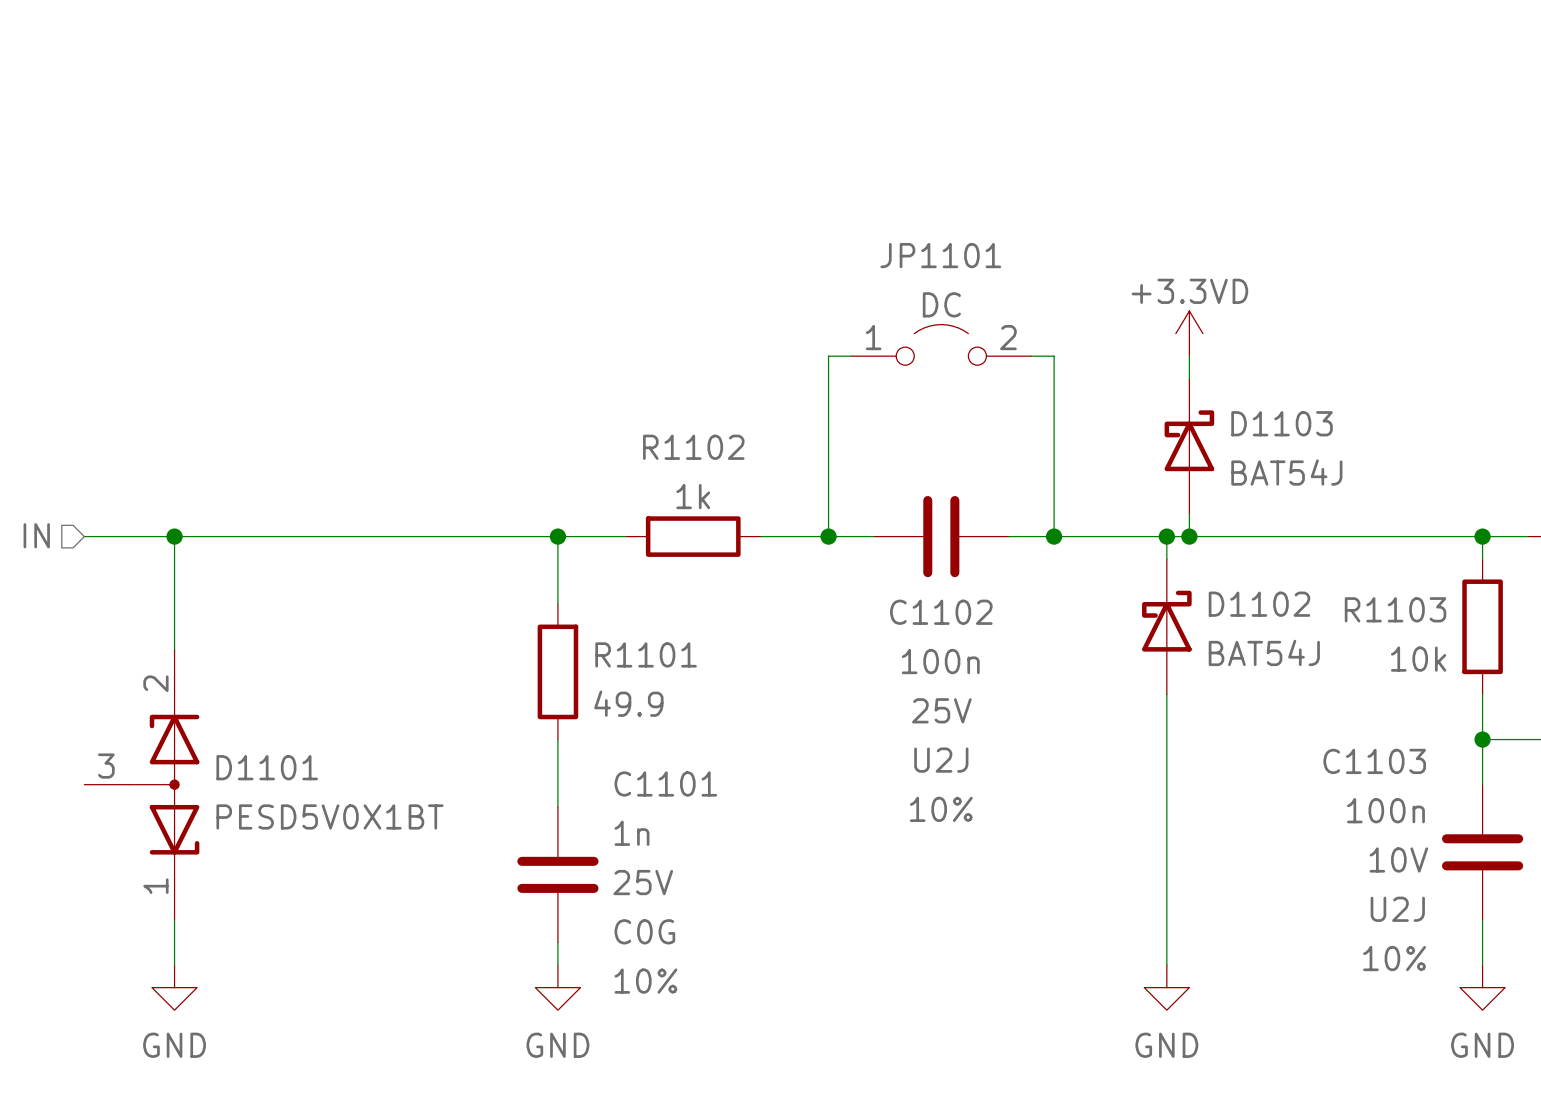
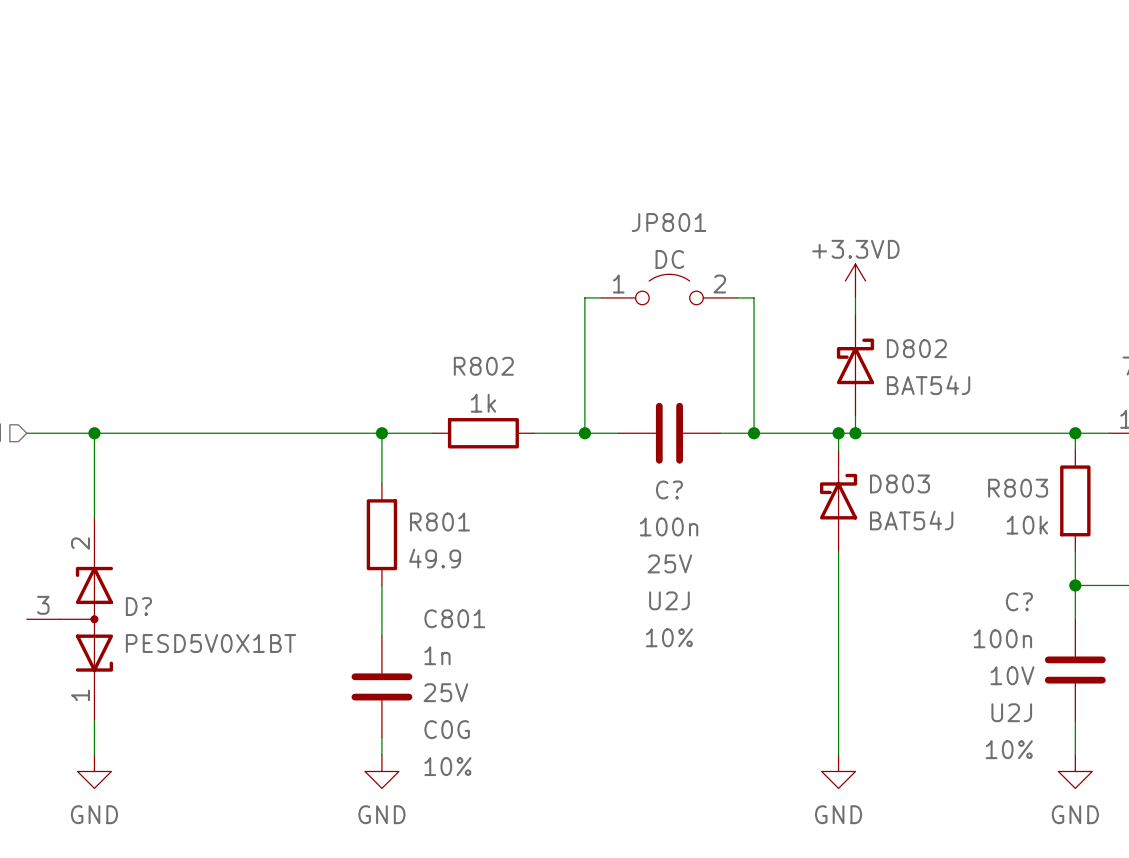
JP1101 name: JP1101 (940, 255) -> JP801 (669, 222)
D1103 name: D1103 (1282, 423) -> D802 (916, 348)
R1102 name: R1102 (693, 447) -> R802 (483, 366)
D1102 name: D1102 (1259, 604) -> D803 (899, 483)
R1103 name: R1103 (1395, 609) -> R803 (1018, 488)
C1102 name: C1102 (941, 612) -> C? (669, 489)
R1101 name: R1101 (646, 654) -> R801 (439, 521)
C1103 name: C1103 (1374, 761) -> C? (1019, 601)
D1101 name: D1101 (267, 767) -> D? (138, 606)
C1101 name: C1101 (665, 783) -> C801 (454, 618)

